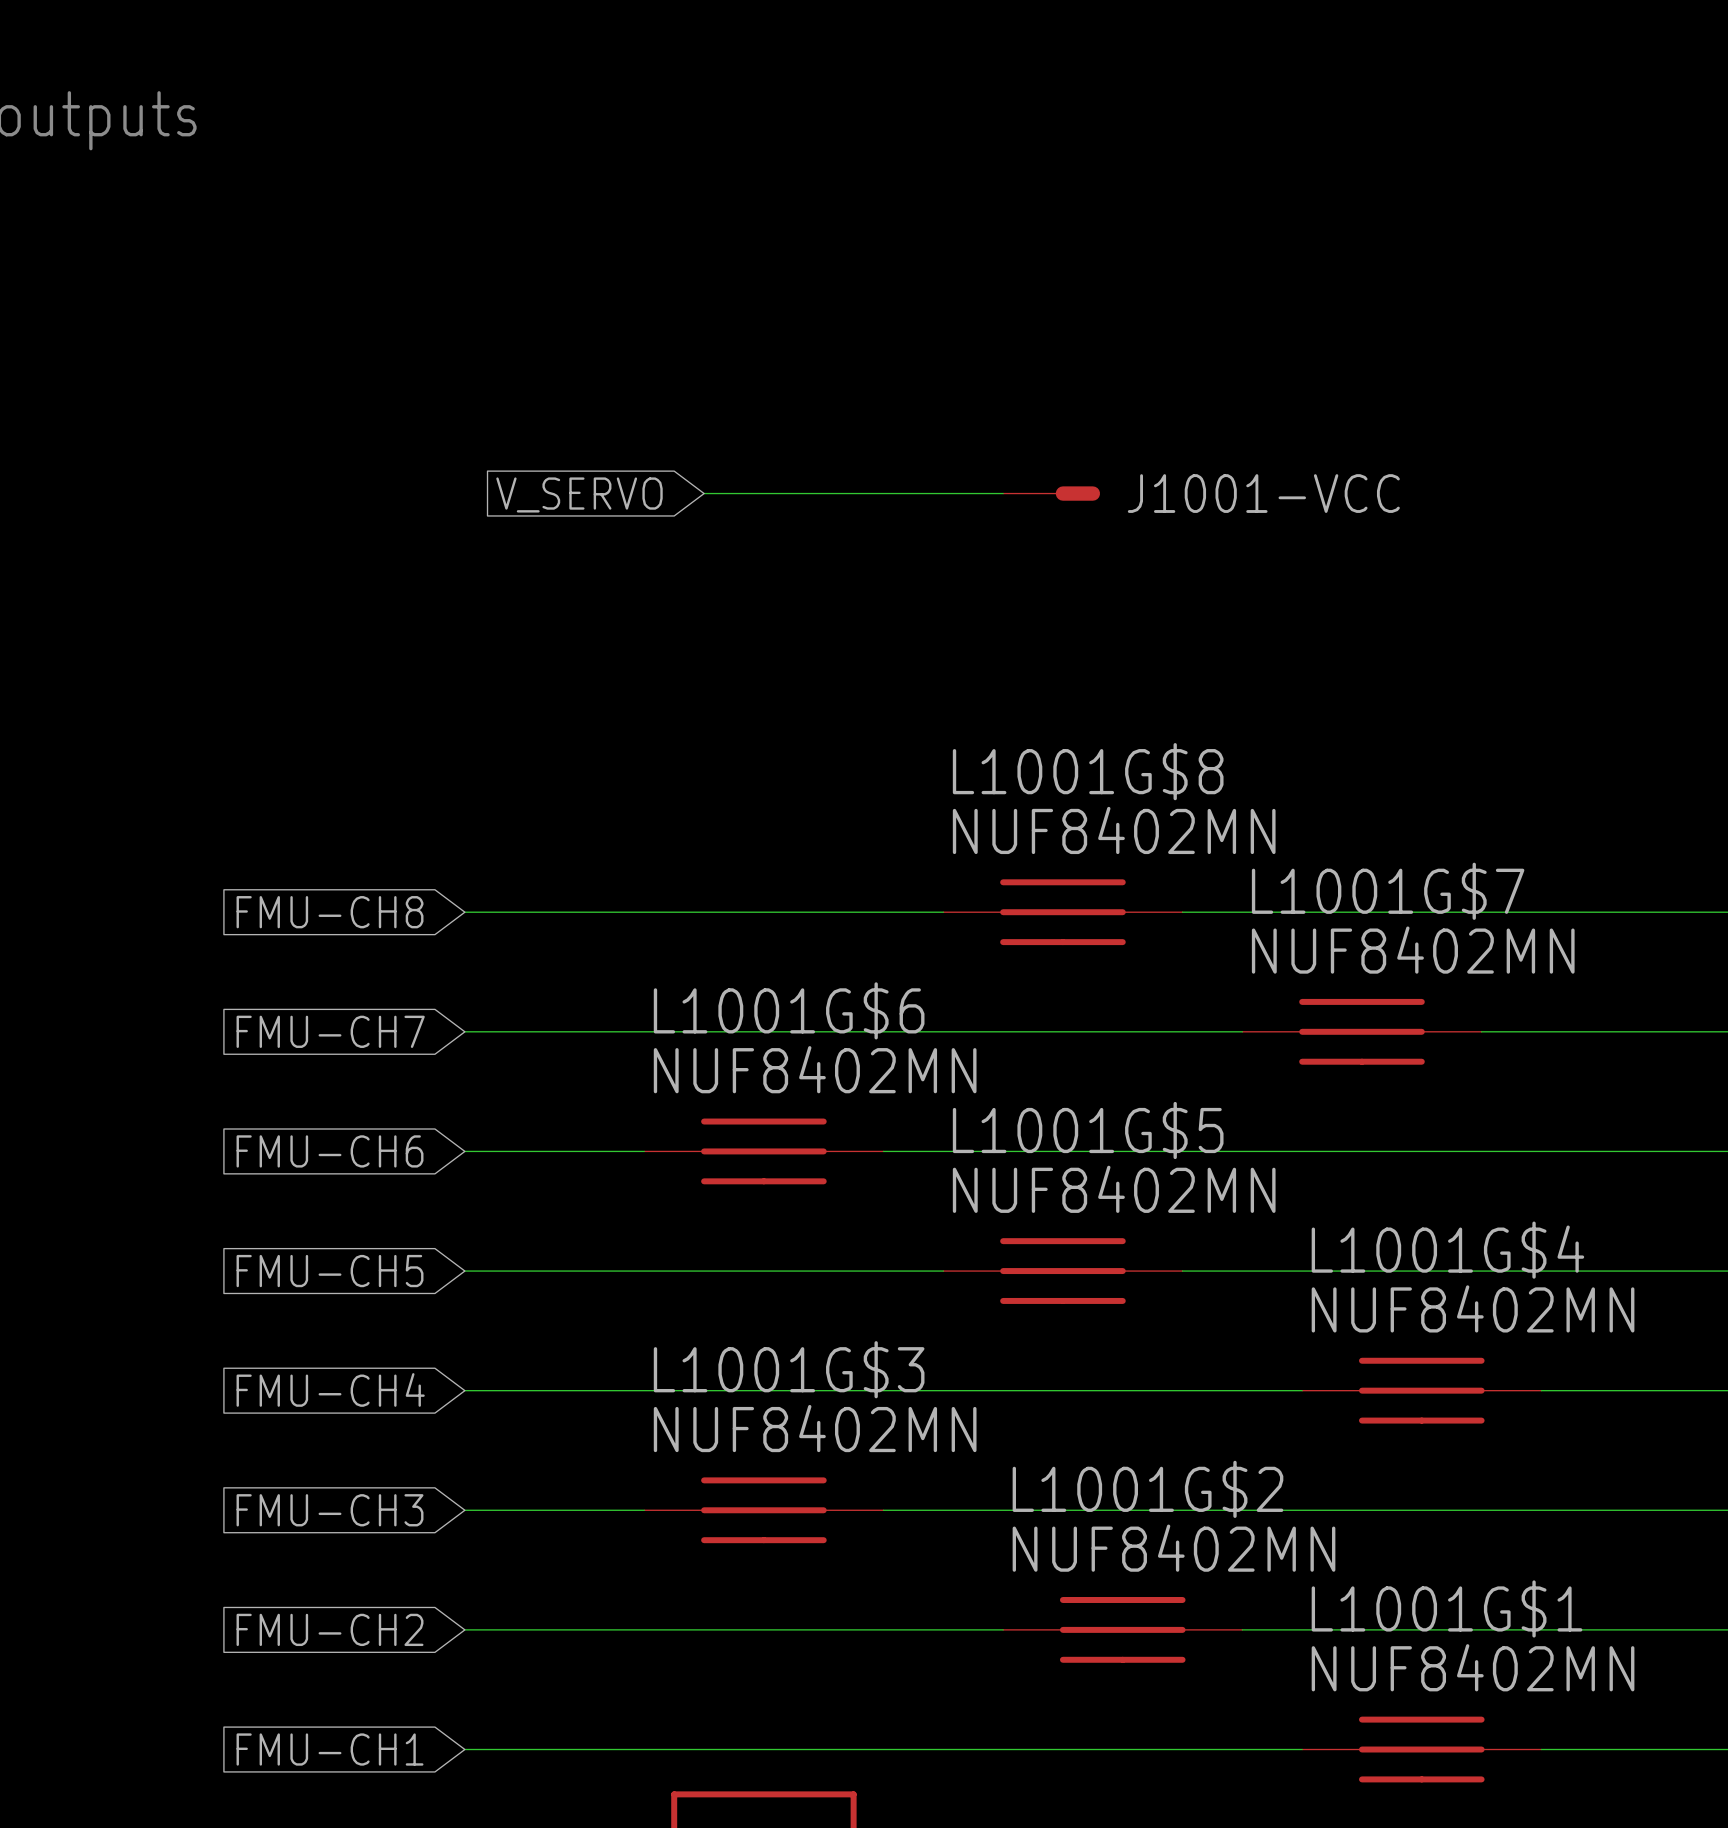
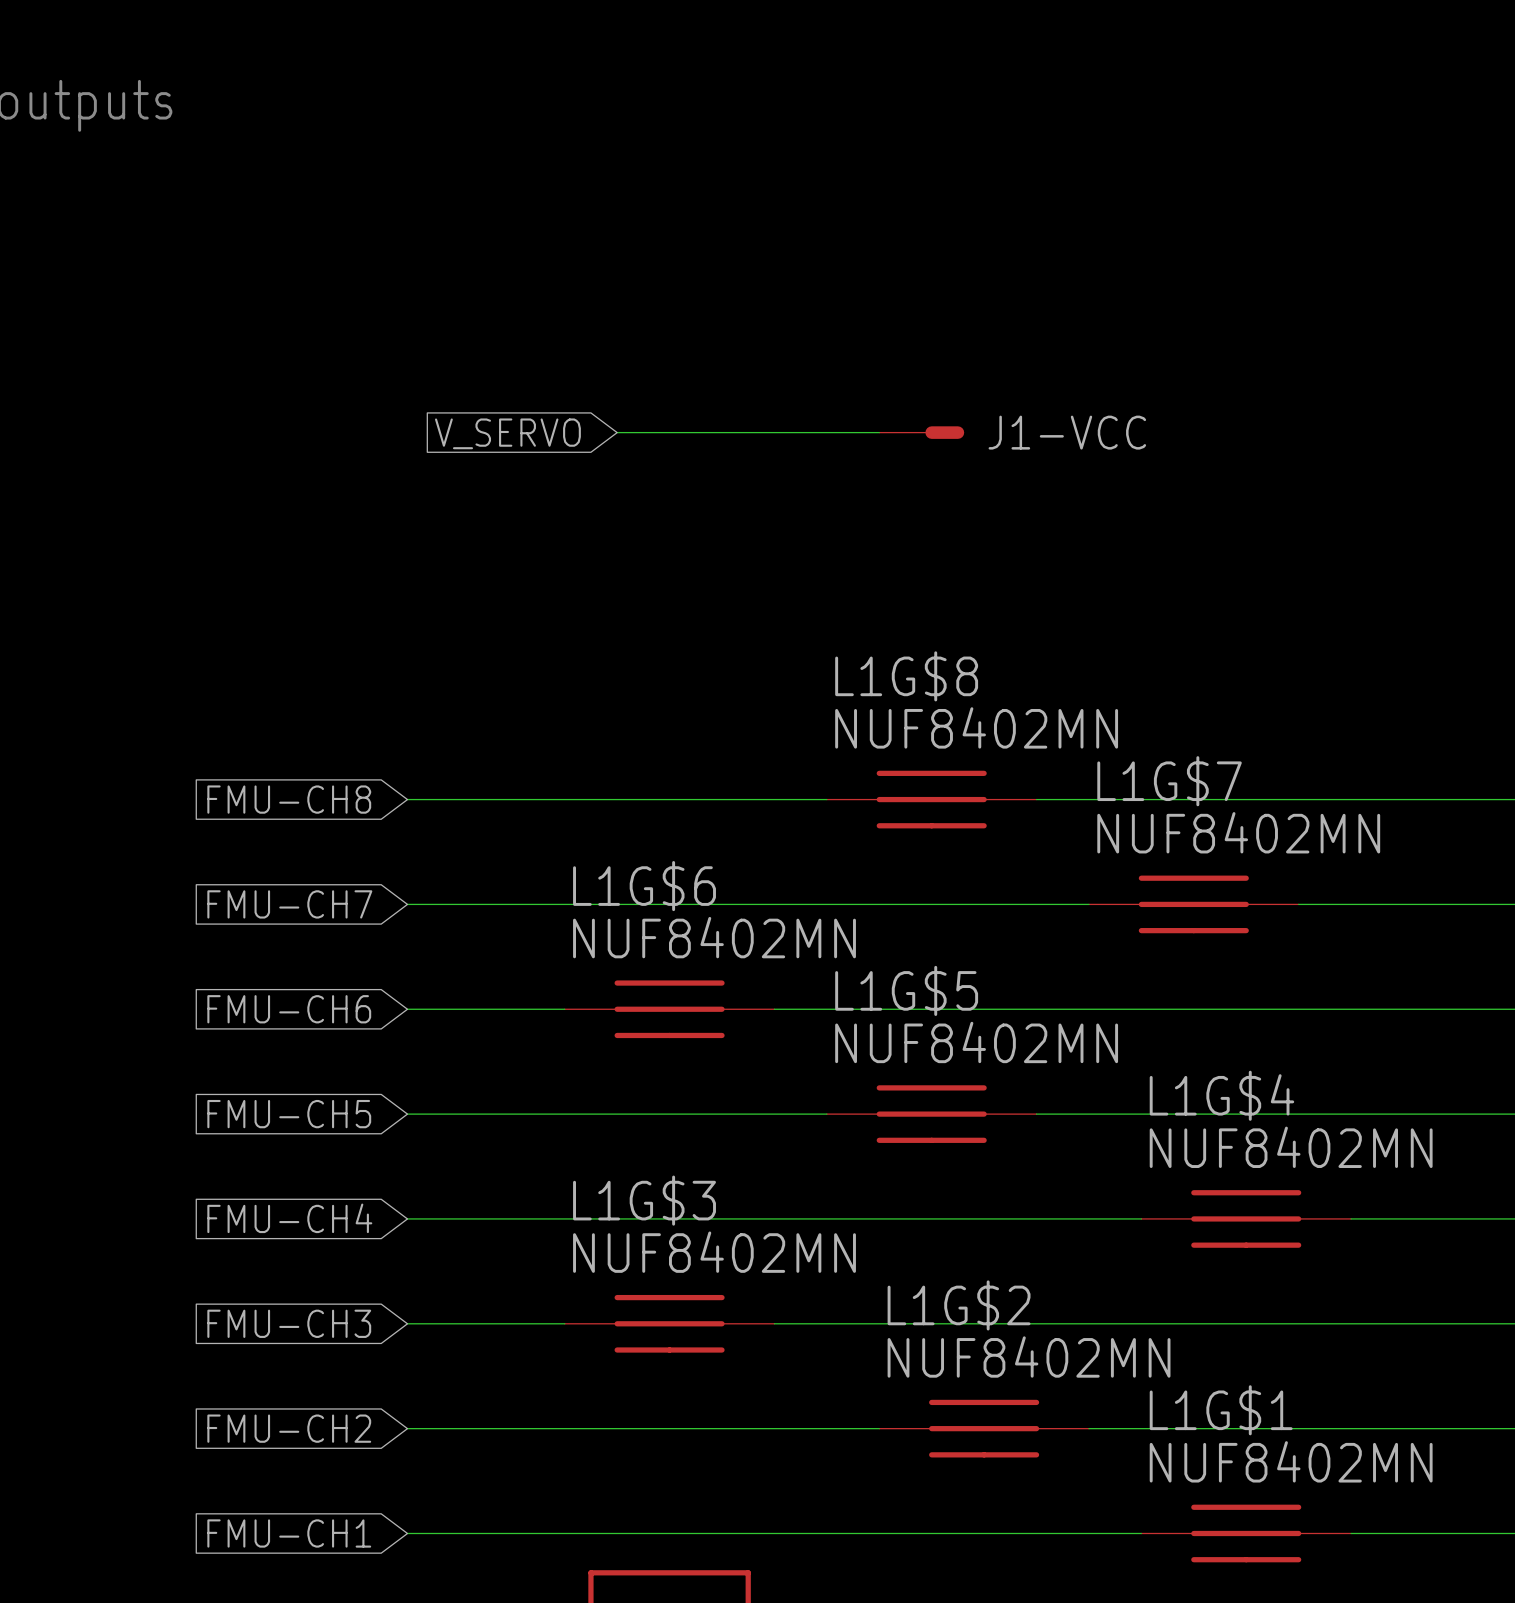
J1001-VCC name: J1001-VCC (1263, 493) -> J1-VCC (1067, 432)
L1001G$8 name: L1001G$8 (1088, 771) -> L1G$8 (906, 676)
L1001G$7 name: L1001G$7 (1388, 891) -> L1G$7 (1169, 781)
L1001G$6 name: L1001G$6 (789, 1010) -> L1G$6 (644, 886)
L1001G$5 name: L1001G$5 (1088, 1130) -> L1G$5 (906, 990)
L1001G$4 name: L1001G$4 (1447, 1250) -> L1G$4 (1221, 1095)
L1001G$3 name: L1001G$3 (789, 1369) -> L1G$3 (644, 1200)
L1001G$2 name: L1001G$2 (1147, 1489) -> L1G$2 (959, 1305)
L1001G$1 name: L1001G$1 (1447, 1608) -> L1G$1 (1221, 1410)

